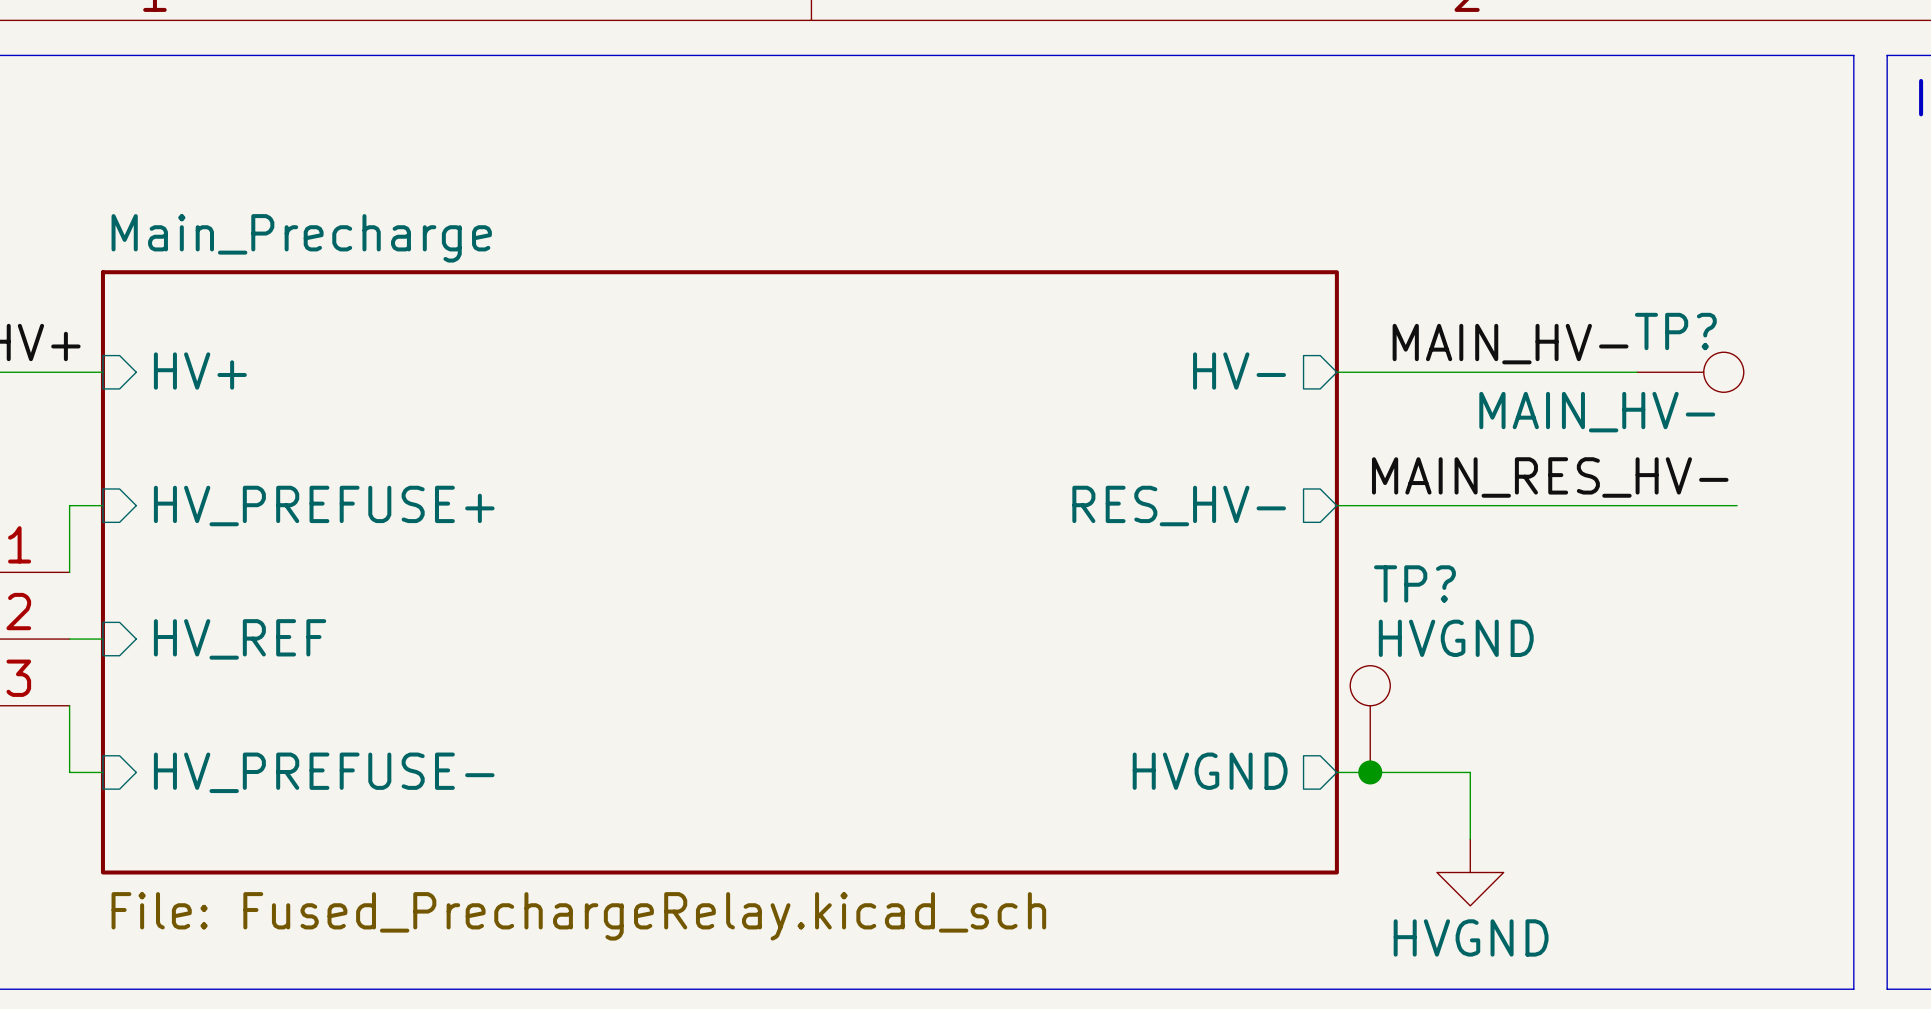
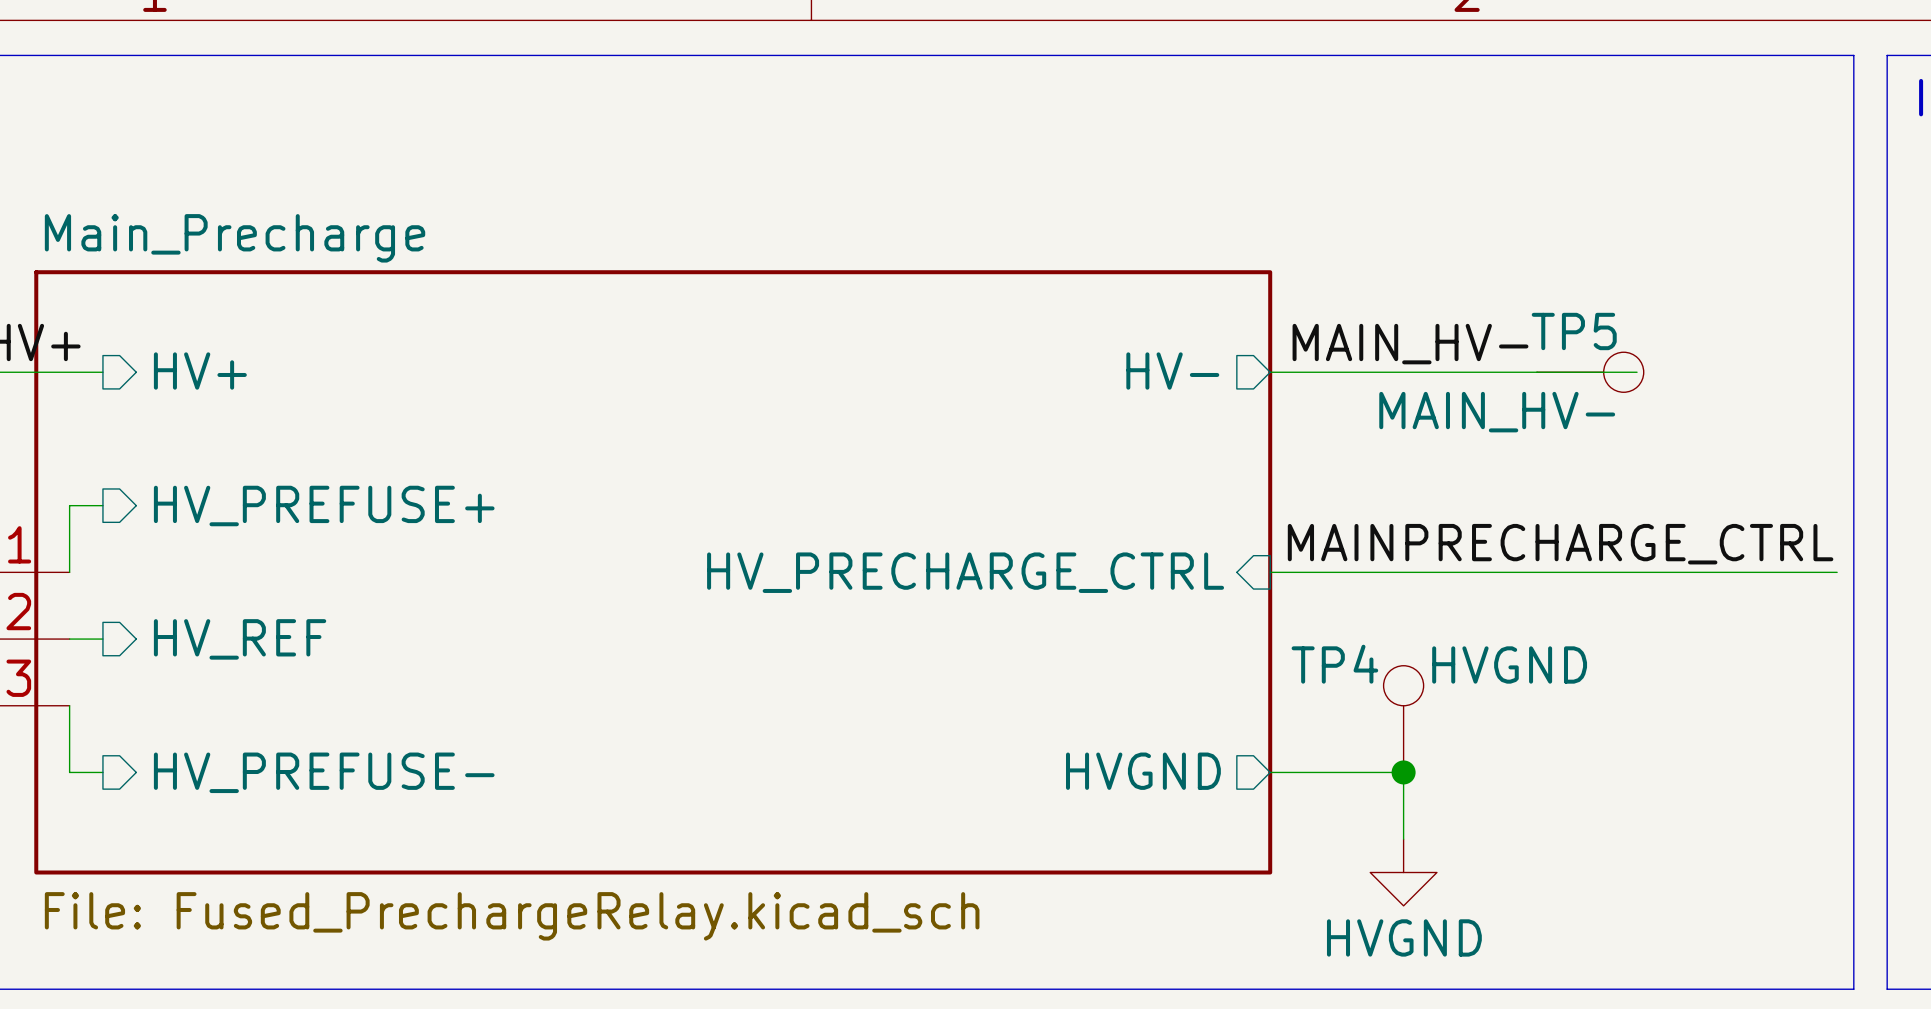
label position: MAIN_HV- (1510, 344) -> MAIN_HV- (1410, 344)
sheet pin position: HV- (1239, 371) -> HV- (1172, 371)
wire: none -> (1270, 372) (1336, 372)
TP5: none -> MAIN_HV- (1590, 372)
TP?: MAIN_HV- (1690, 372) -> none
label: MAIN_RES_HV- (1550, 477) -> none
wire: (1336, 505) (1737, 505) -> none
sheet pin: RES_HV- (1179, 506) -> none
label: none -> MAINPRECHARGE_CTRL (1560, 544)
sheet Main_Precharge position: (719, 572) -> (653, 572)
sheet pin: none -> HV_PRECHARGE_CTRL (965, 572)
wire: none -> (1270, 572) (1837, 572)
TP?: HVGND (1370, 719) -> none
TP4: none -> HVGND (1403, 719)
sheet pin position: HVGND (1210, 771) -> HVGND (1143, 771)
wire: none -> (1270, 772) (1336, 772)
junction position: (1370, 772) -> (1403, 772)
wire: (1403, 772) (1470, 772) (1470, 839) -> (1403, 772) (1403, 839)
power symbol position: HVGND (1470, 872) -> HVGND (1403, 872)

